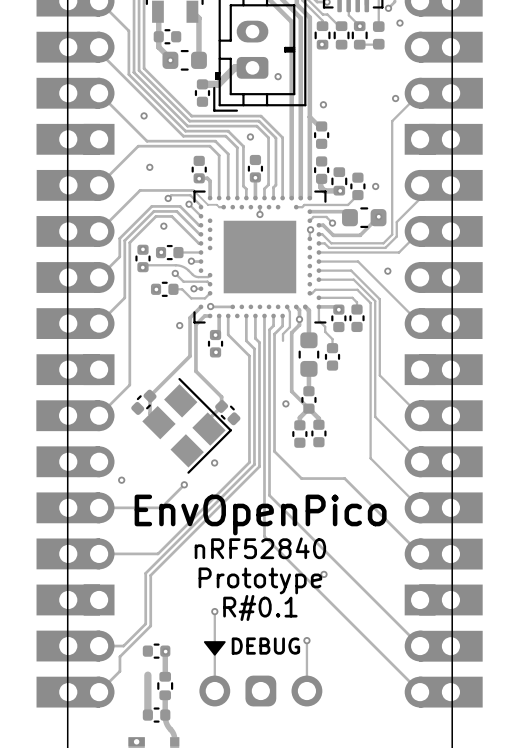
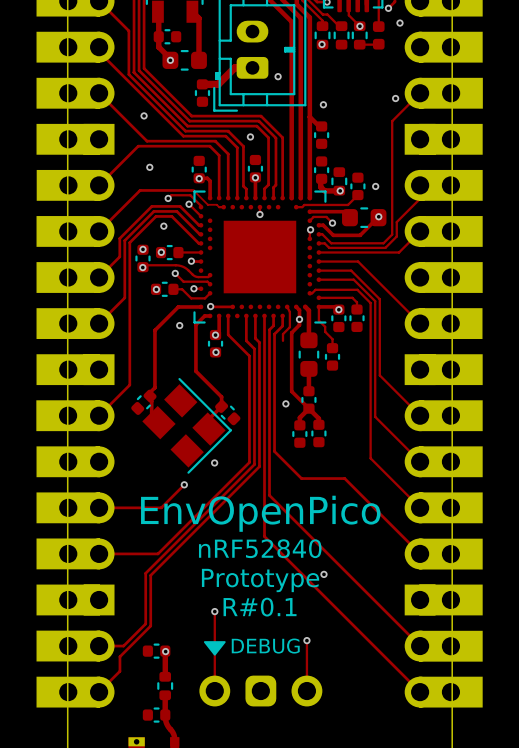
via: (387, 271) -> none
track: (200, 306) (190, 317) (190, 356) (150, 396) (151, 415) -> (200, 306) (178, 306) (154, 330) (154, 387) (146, 396) (151, 401) (151, 415)
via: (121, 480) -> none
track: (147, 675) (147, 715) -> none

